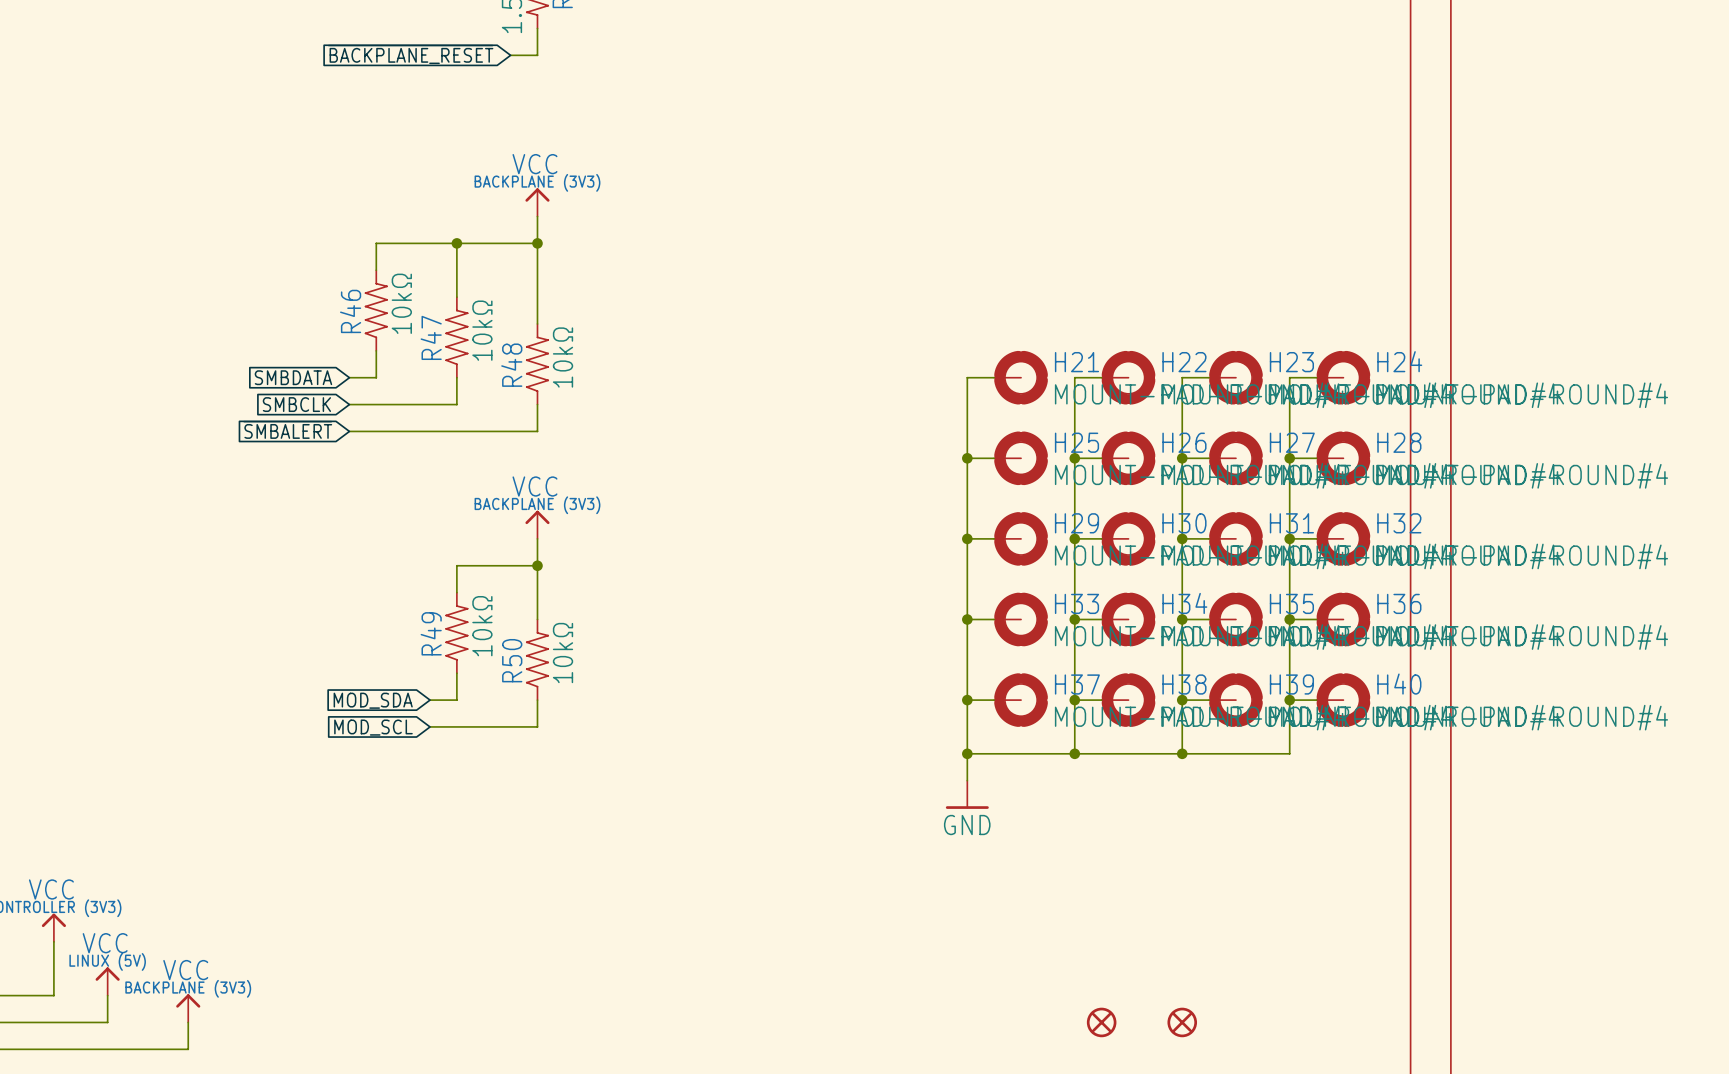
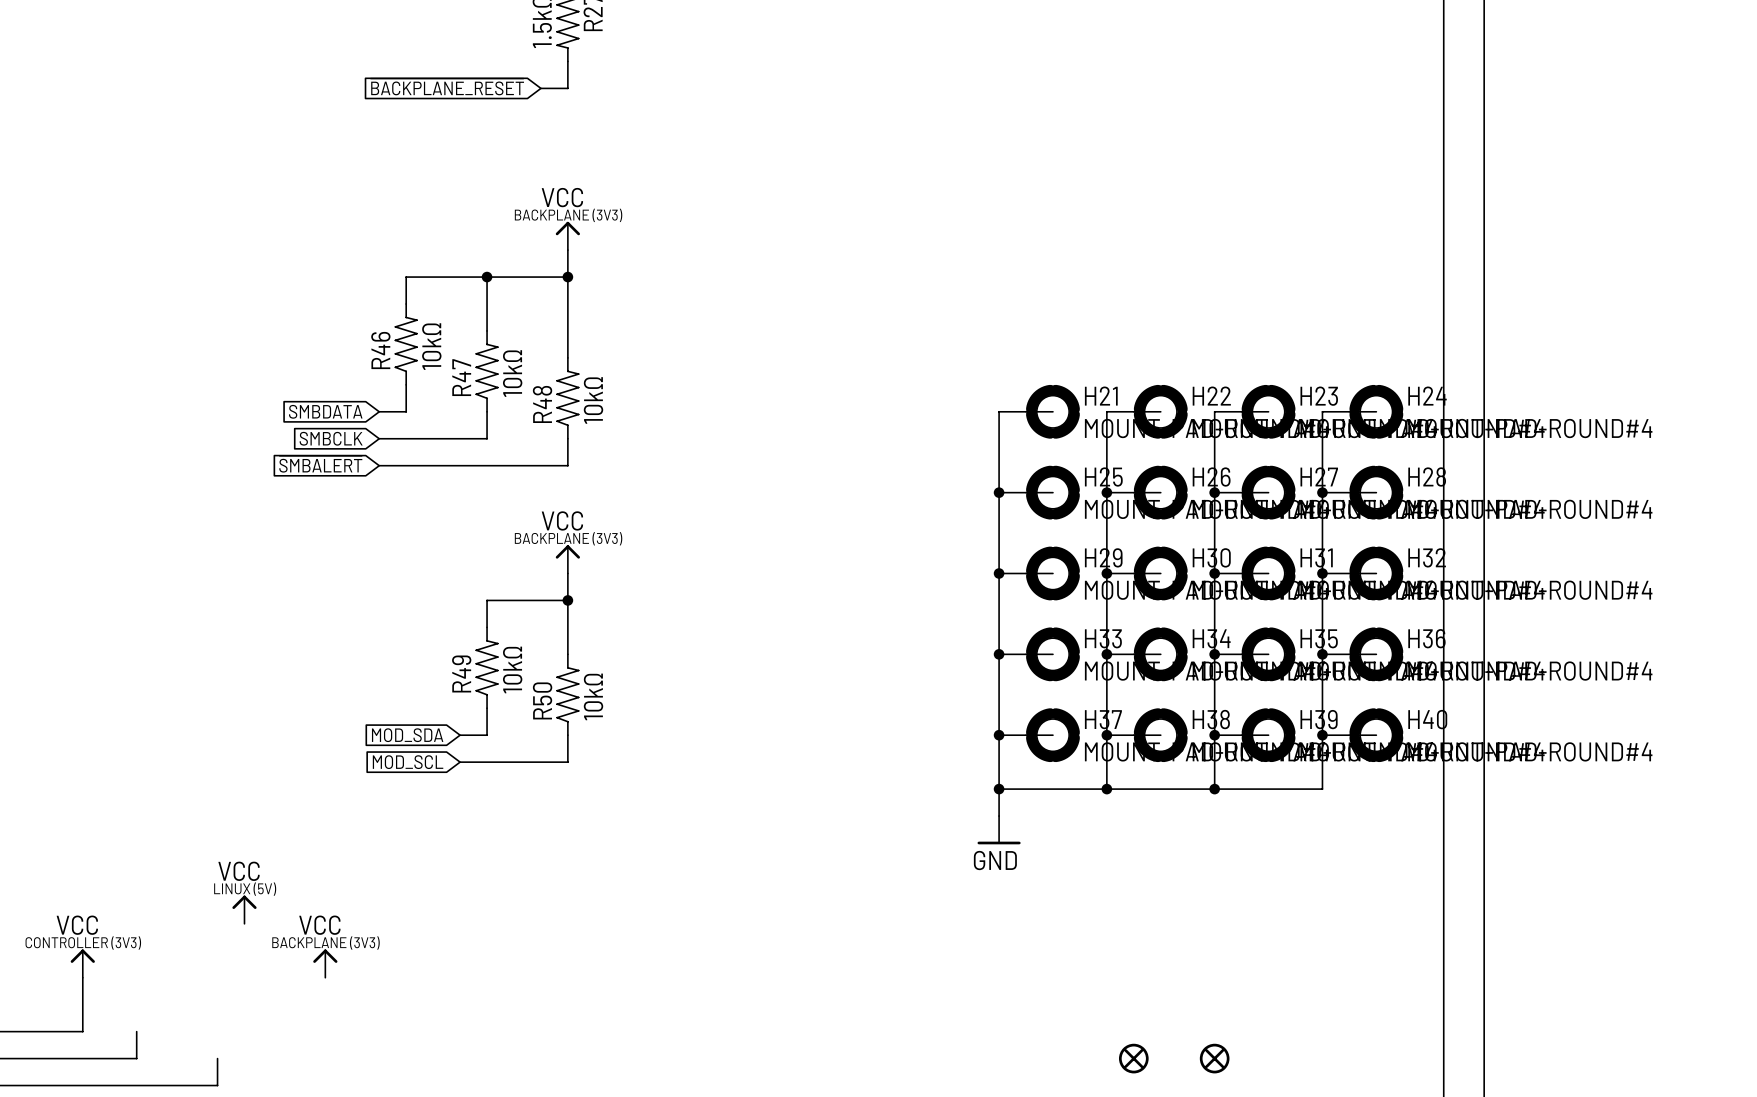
power symbol position: (107, 981) -> (244, 909)
power symbol position: (188, 1008) -> (325, 963)

